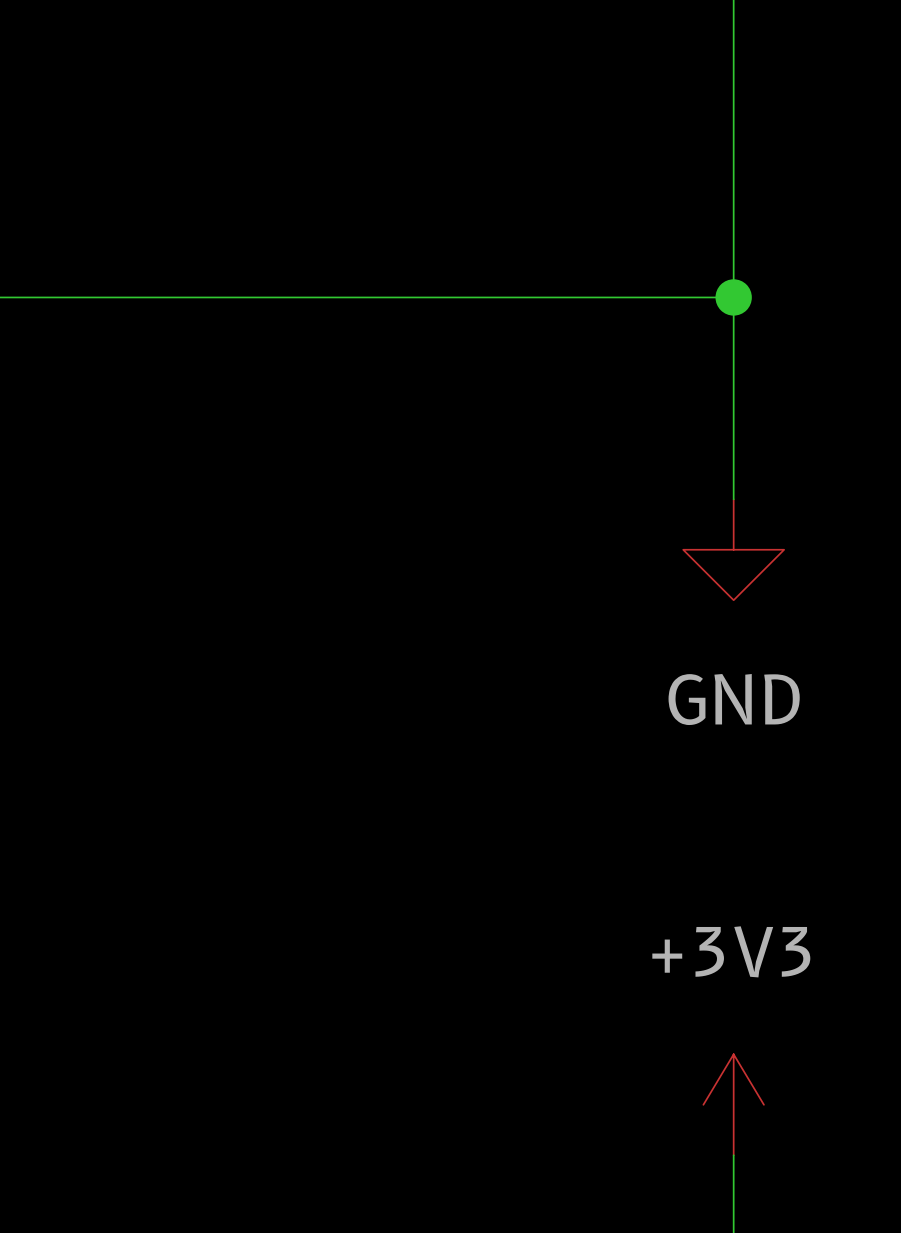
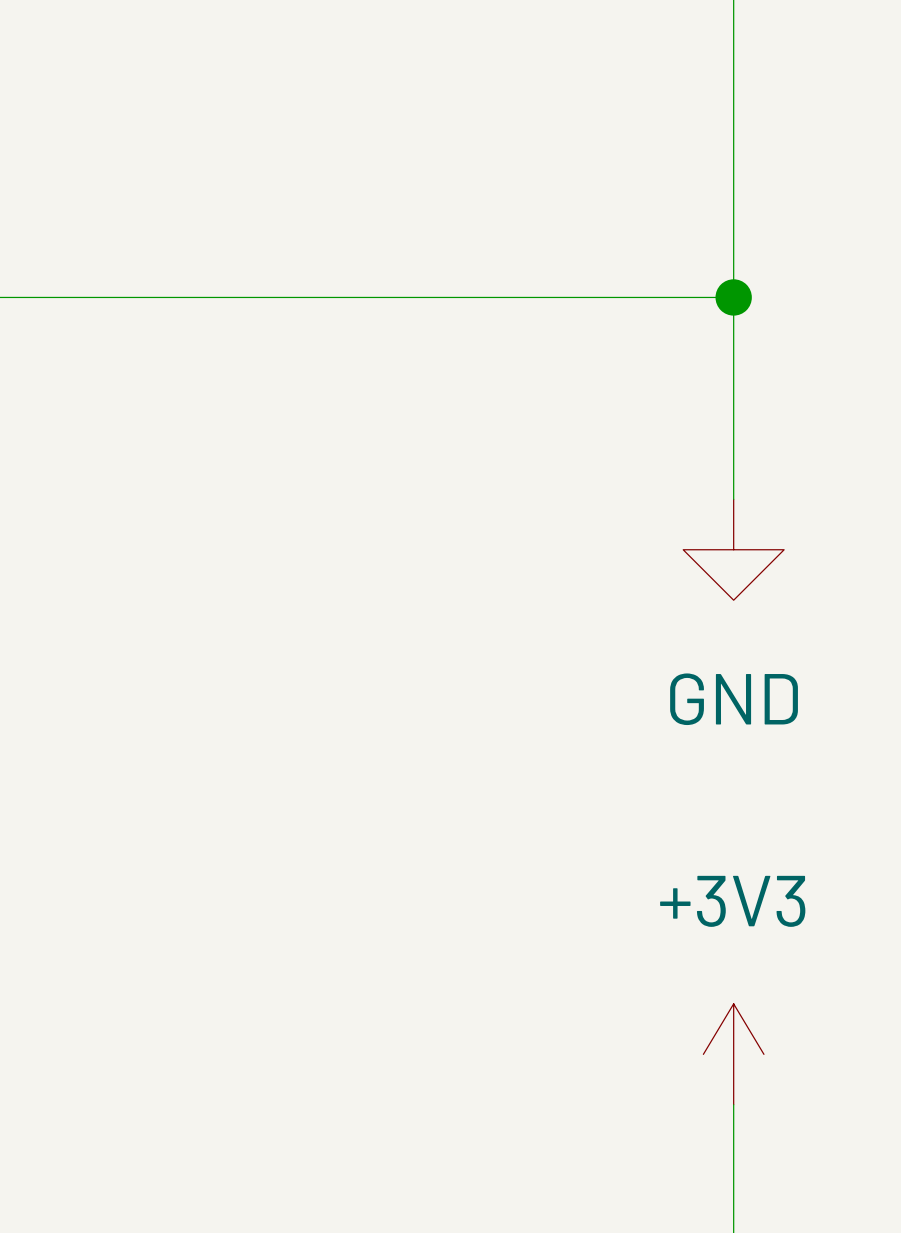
power symbol position: +3V3 (733, 1104) -> +3V3 (733, 1054)

